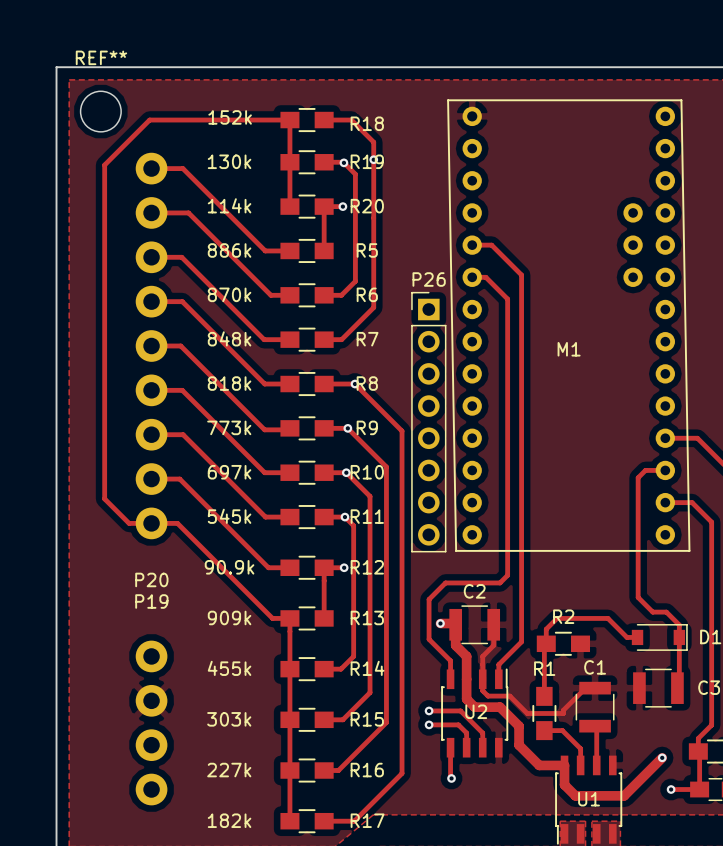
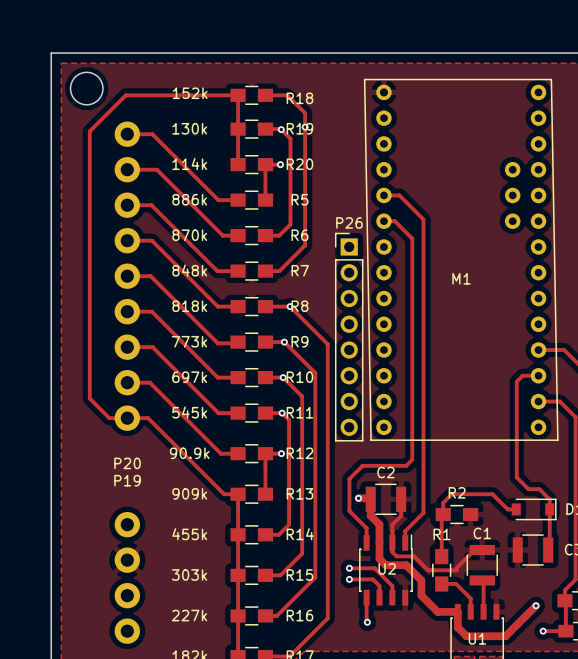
REF** name: REF** (101, 57) -> none

